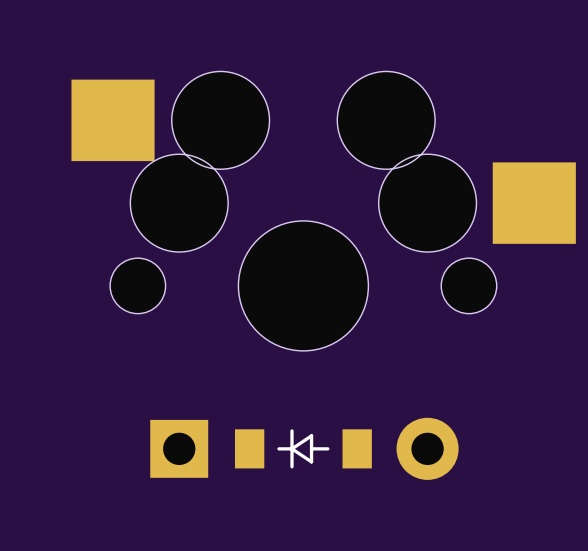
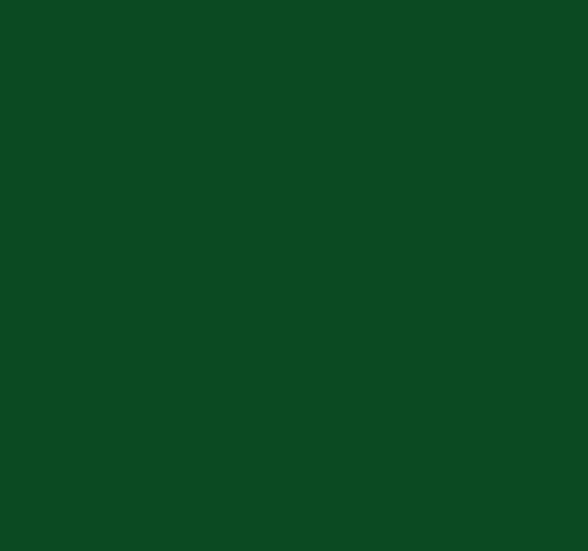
part: (323, 211) -> none
part: (304, 448) -> none

